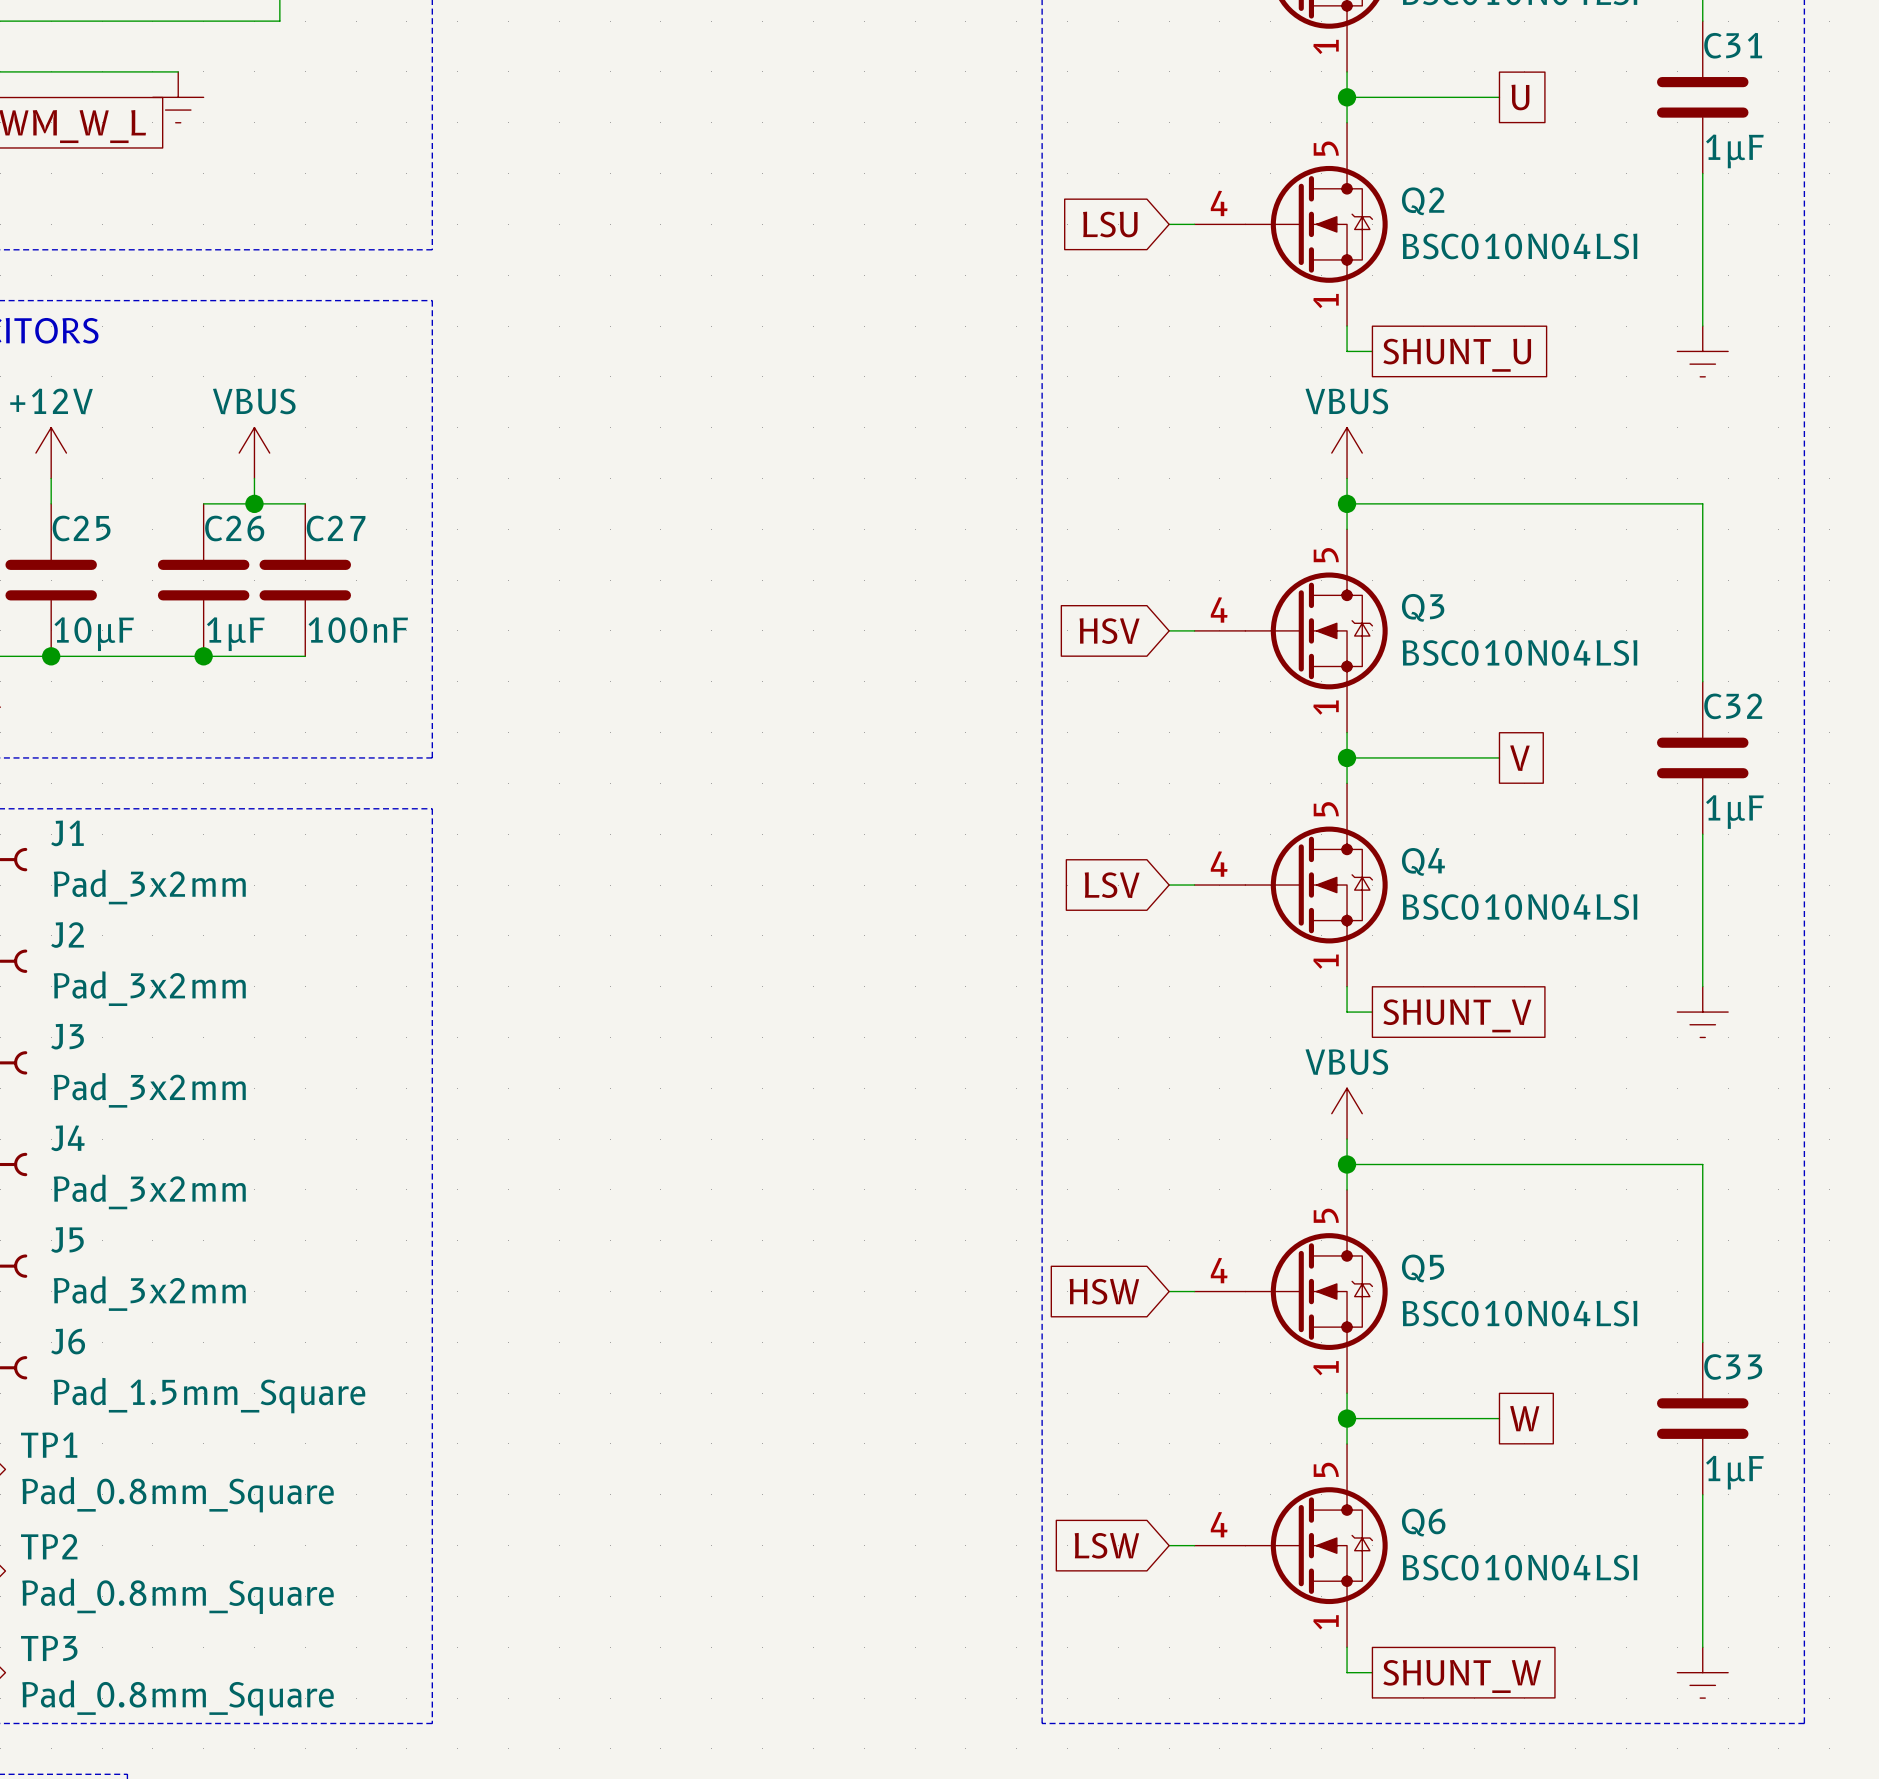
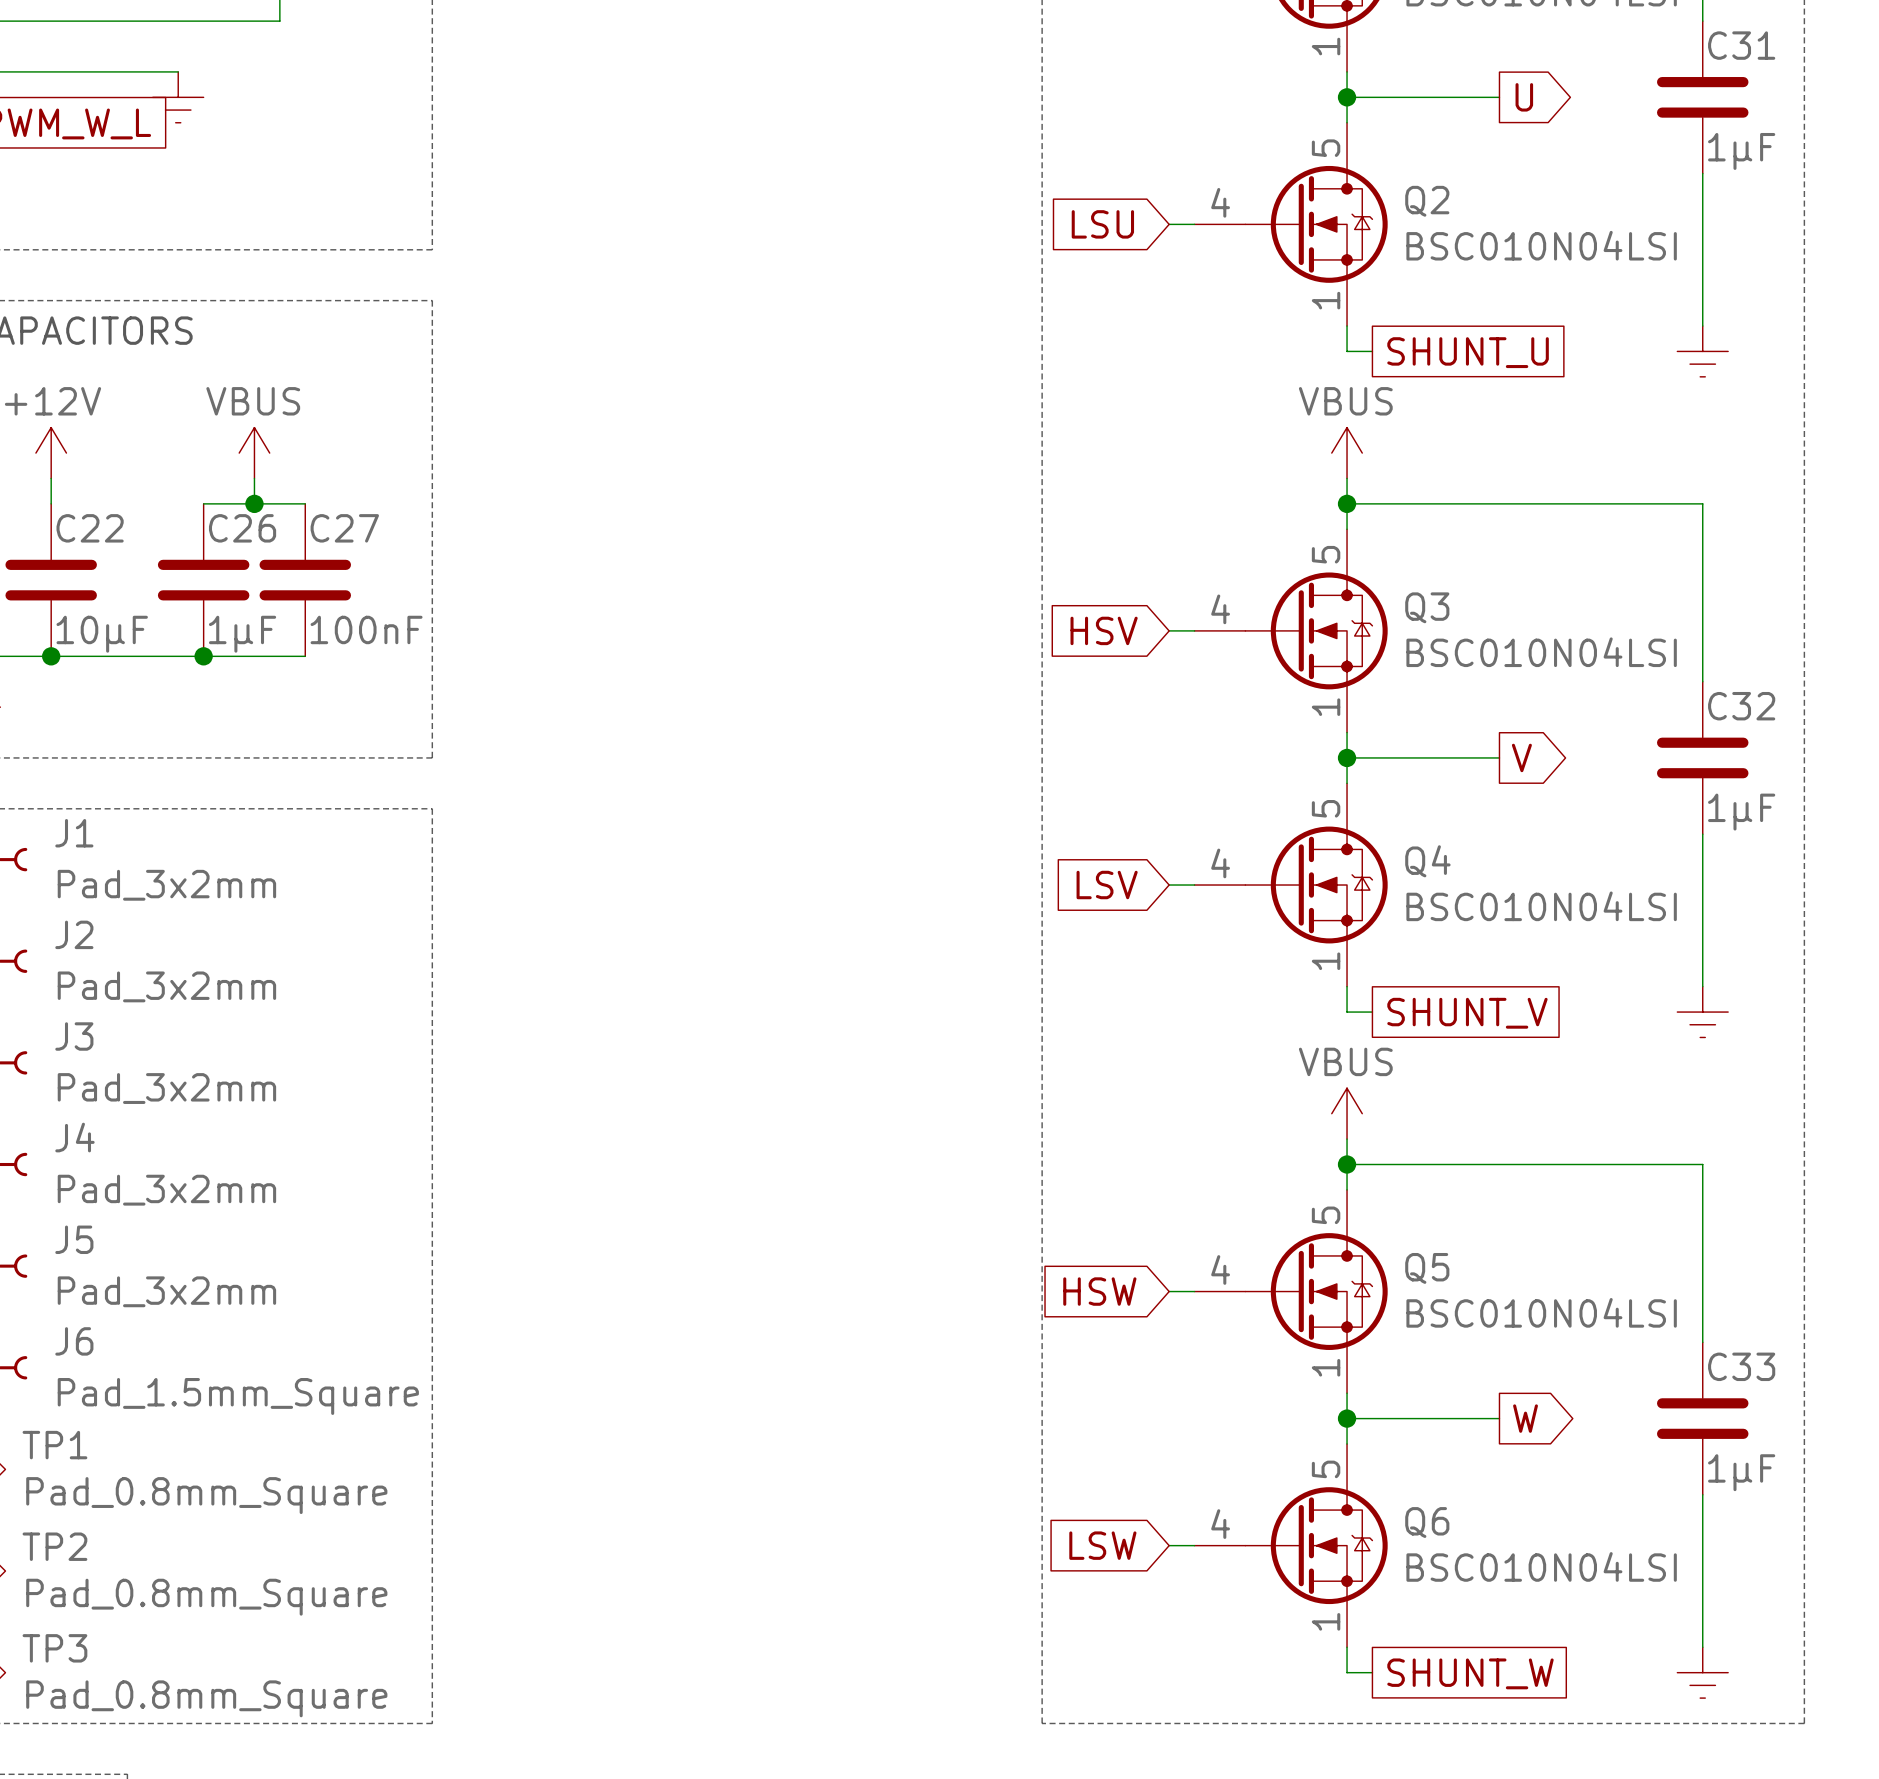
global label shape: passive (1520, 97) -> output (1524, 97)
C25 name: C25 (81, 528) -> C22 (90, 528)
global label shape: passive (1519, 758) -> output (1521, 757)
global label shape: passive (1524, 1418) -> output (1525, 1418)

